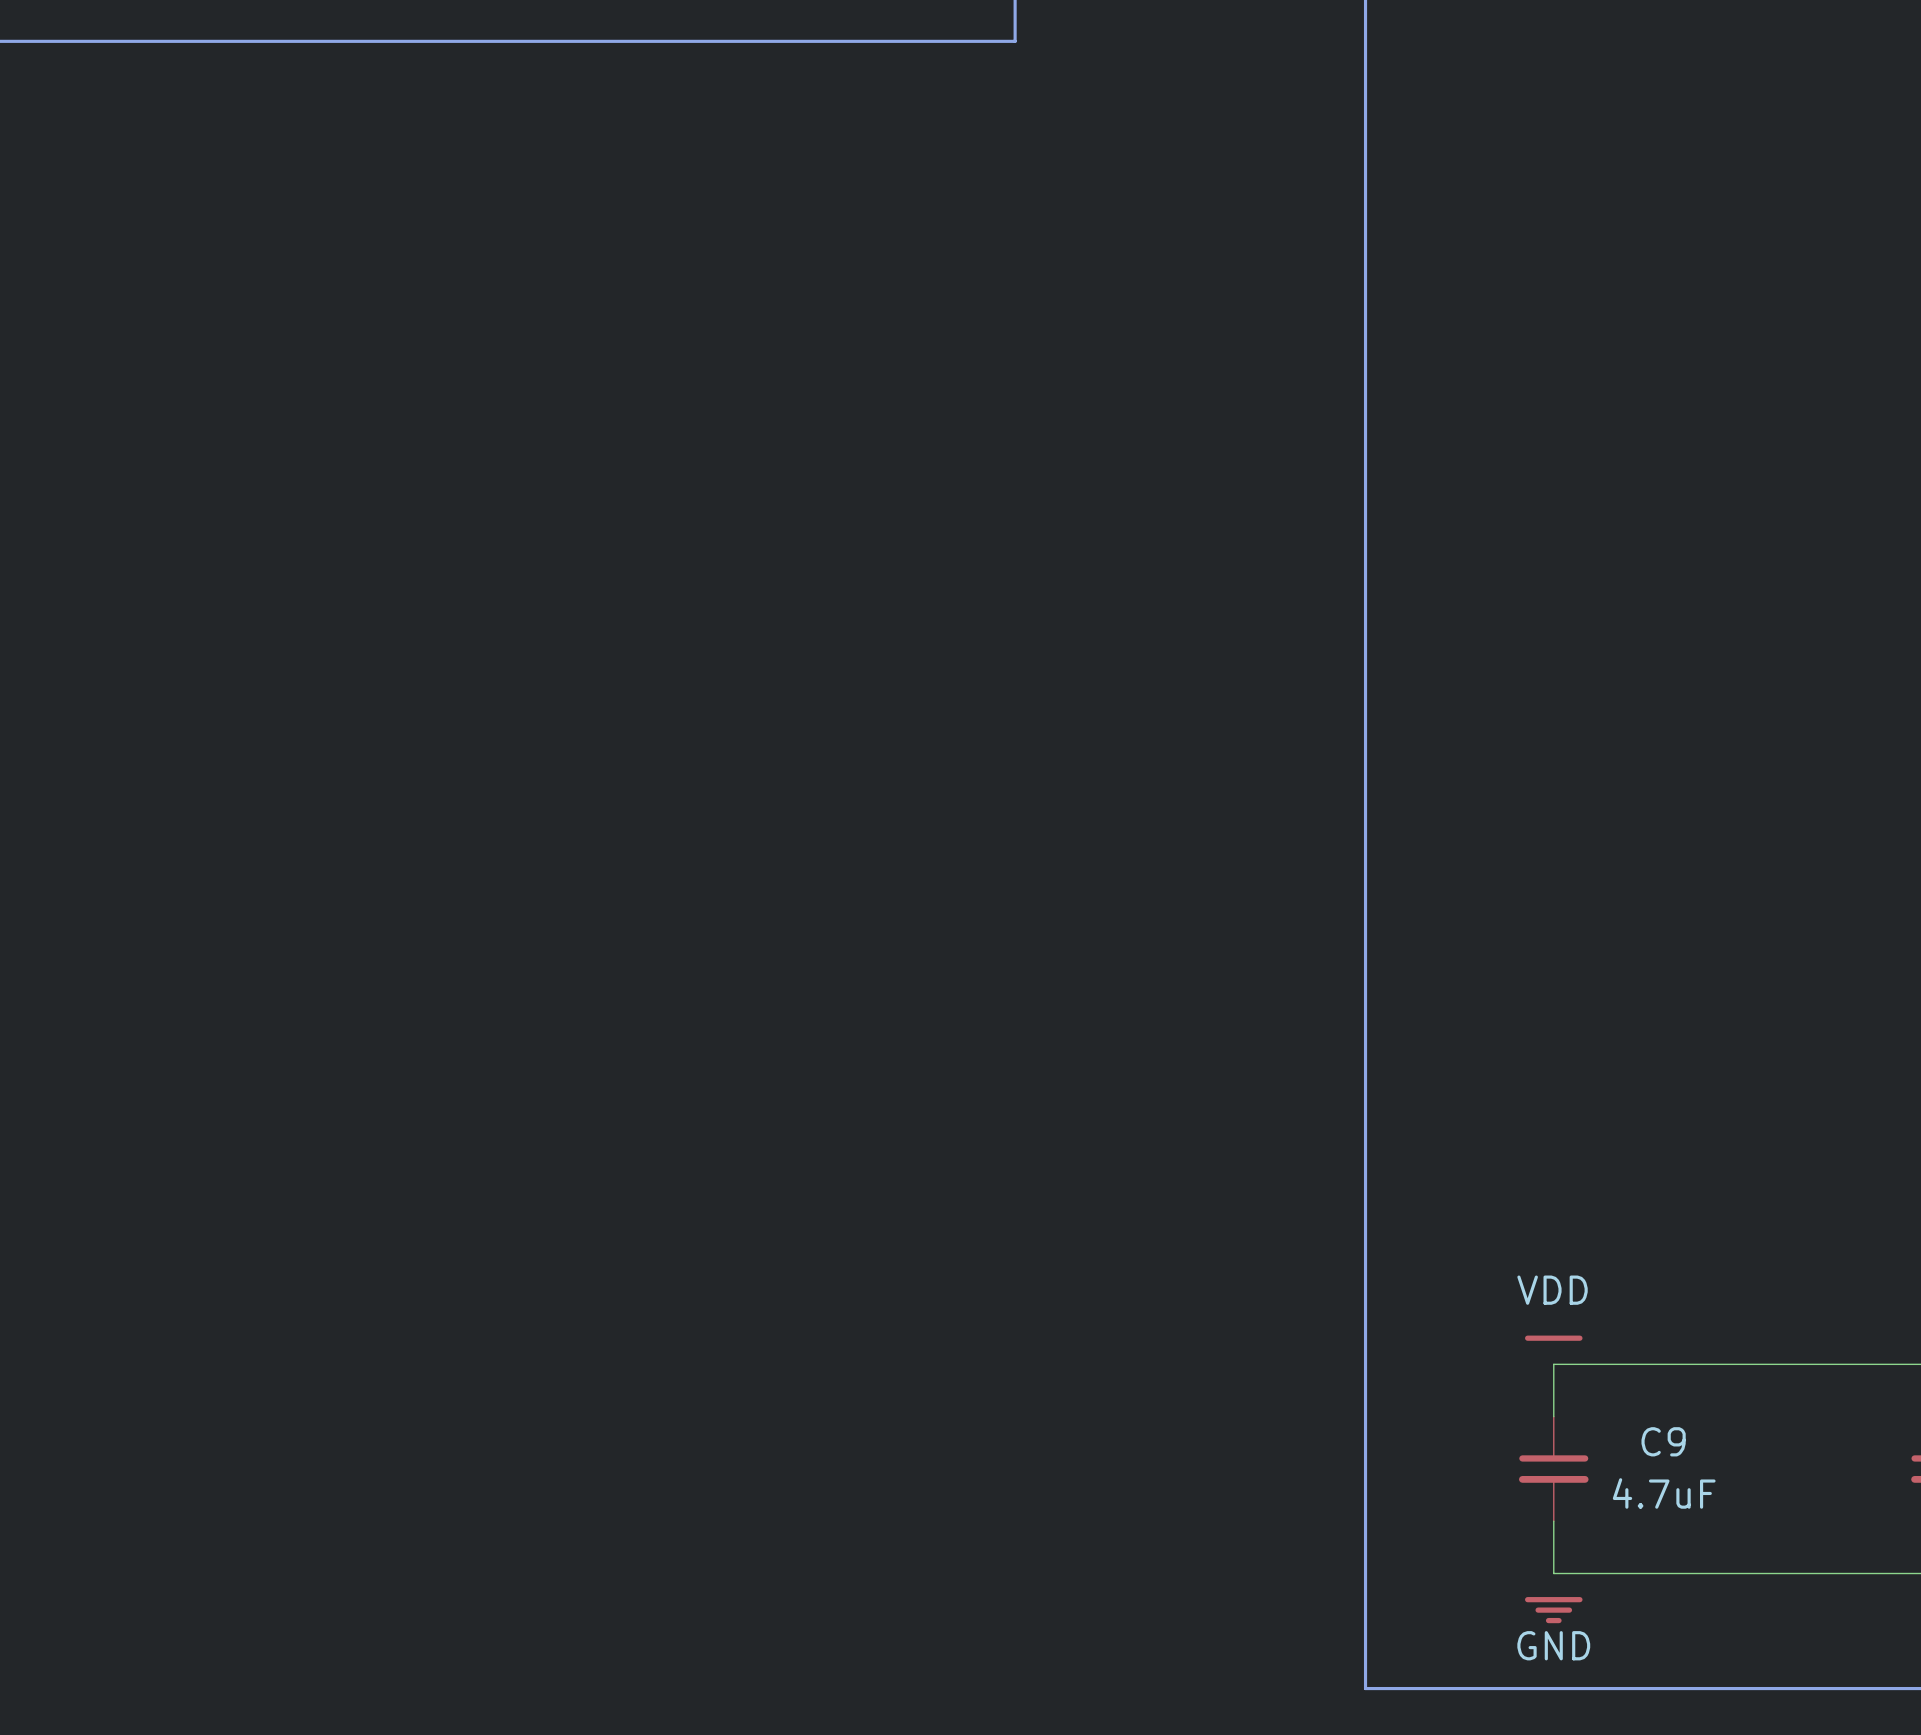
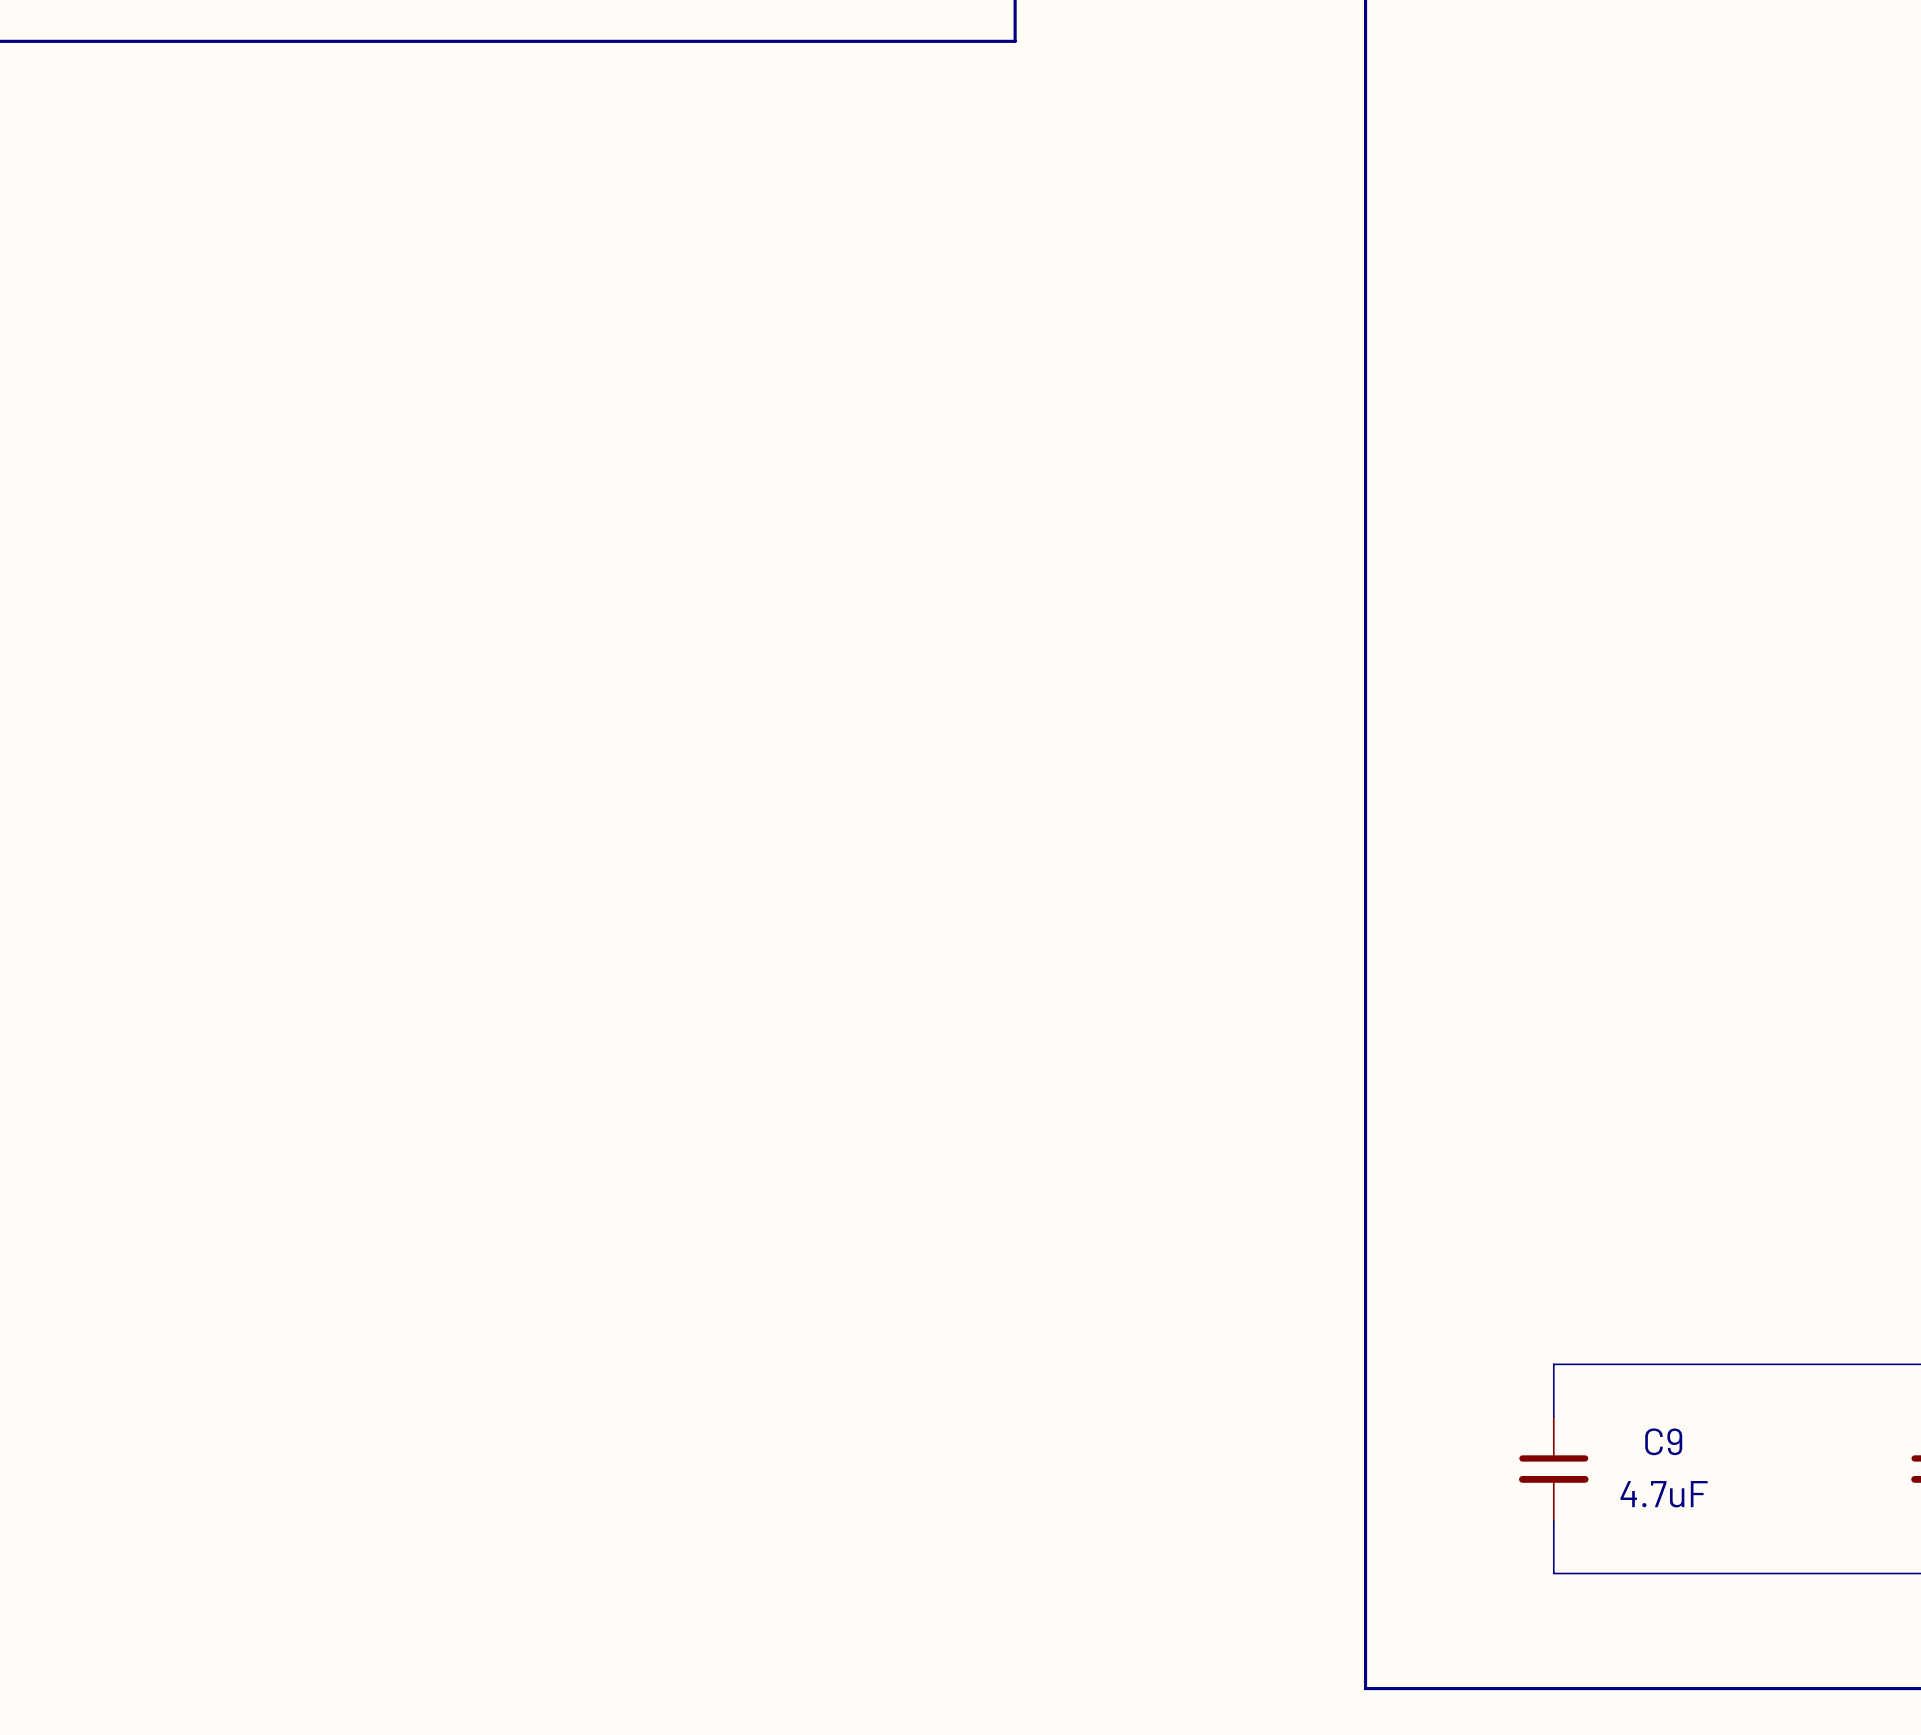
power symbol: VDD (1553, 1338) -> none
power symbol: GND (1553, 1610) -> none

